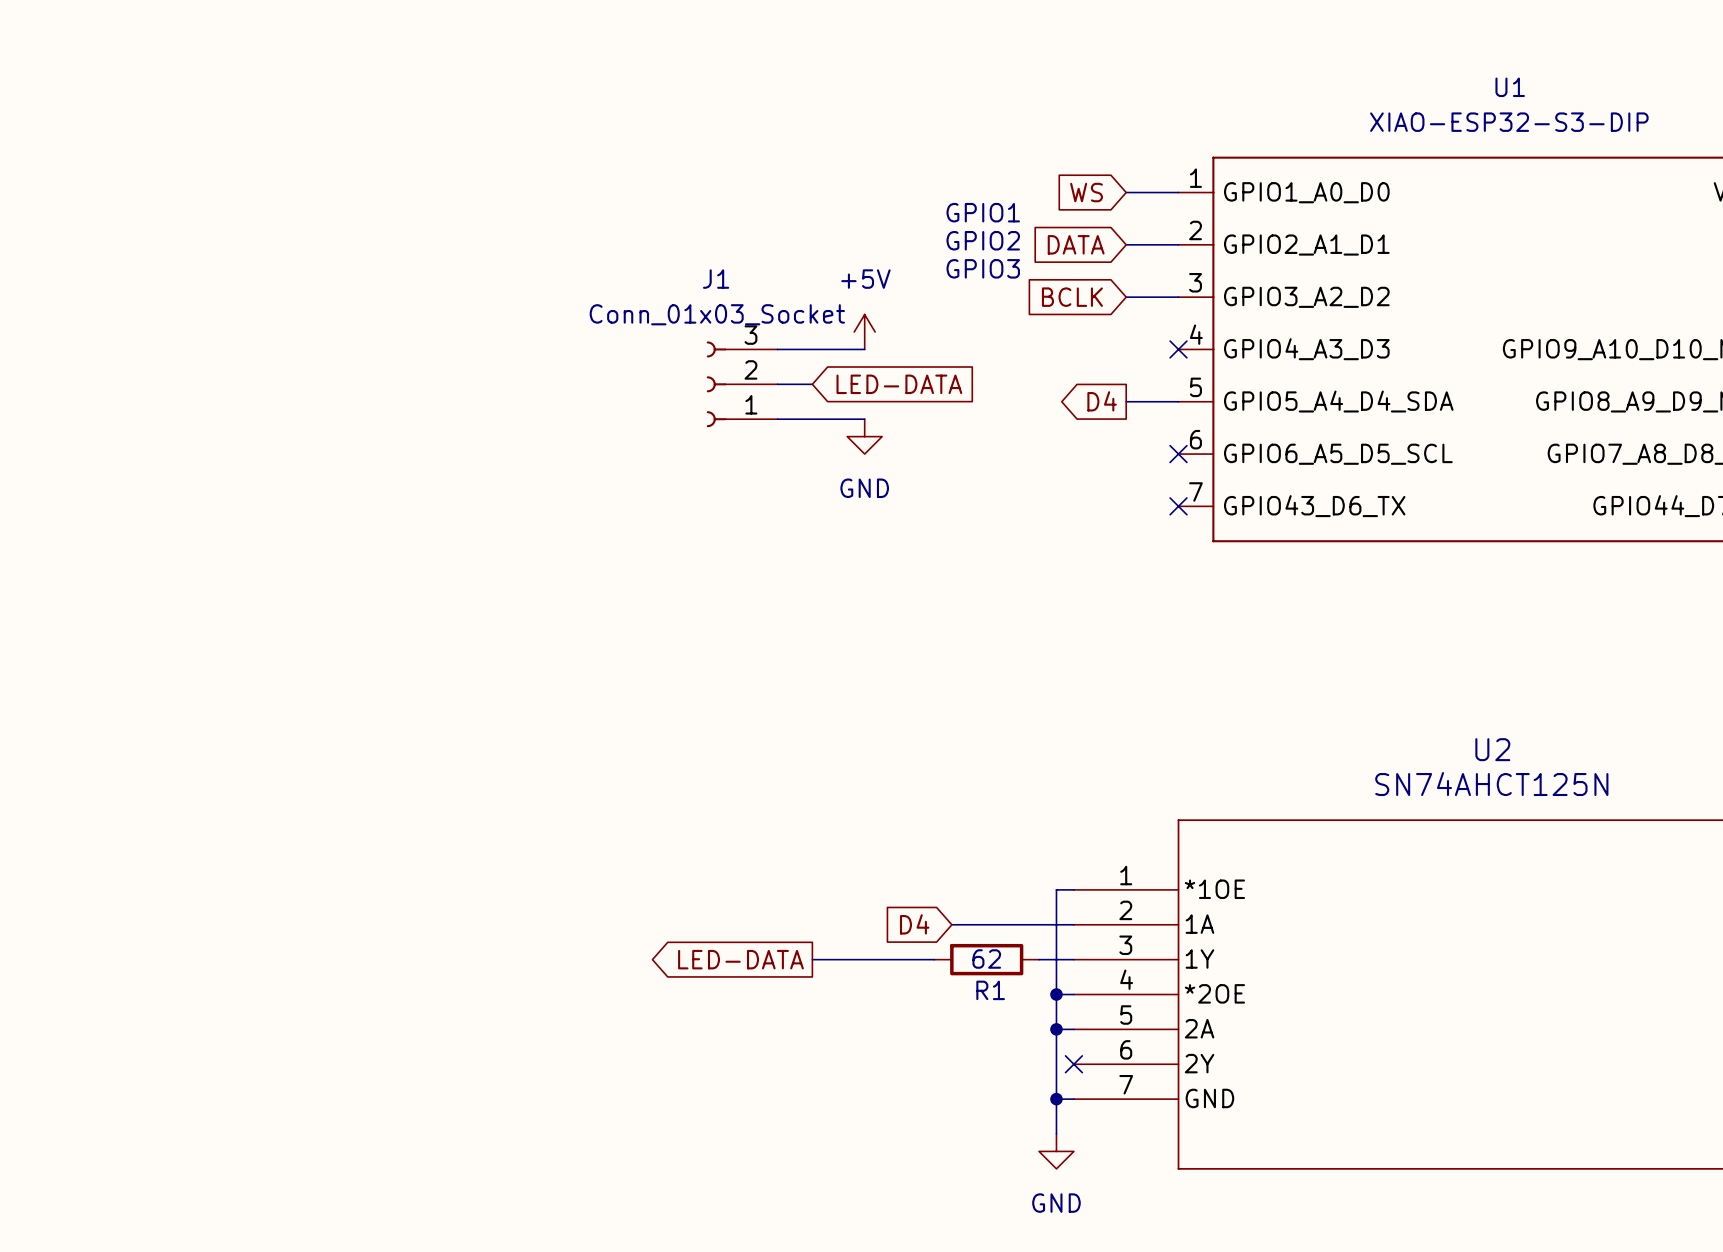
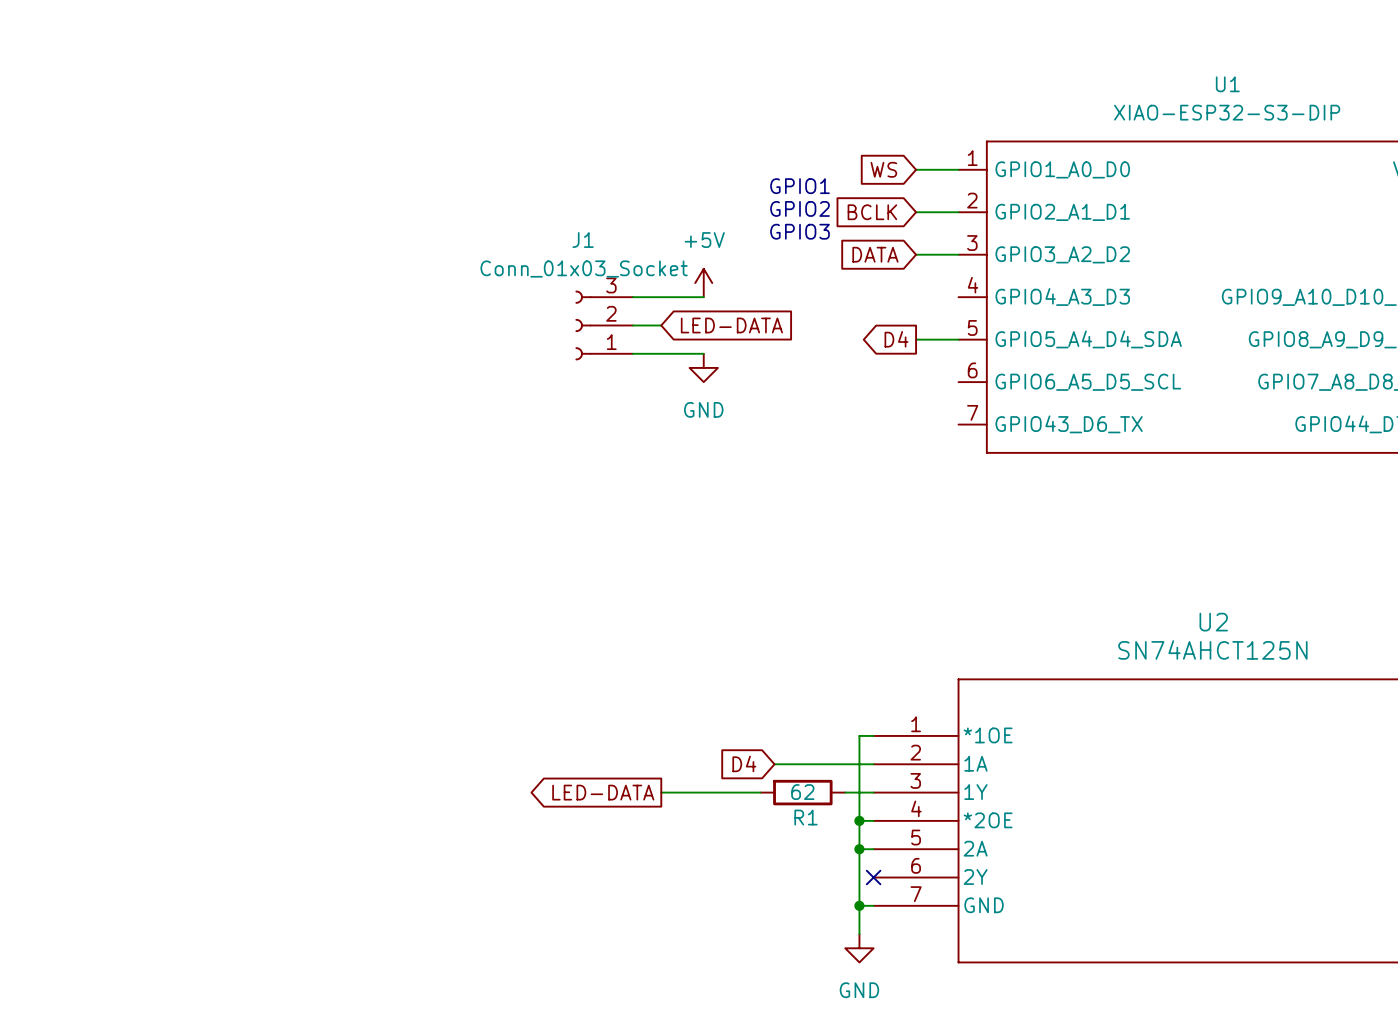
global label: DATA (1076, 244) -> BCLK (872, 212)
global label: BCLK (1072, 297) -> DATA (875, 254)
no-connect mark: (1178, 349) -> none
no-connect mark: (1178, 454) -> none
no-connect mark: (1178, 506) -> none

